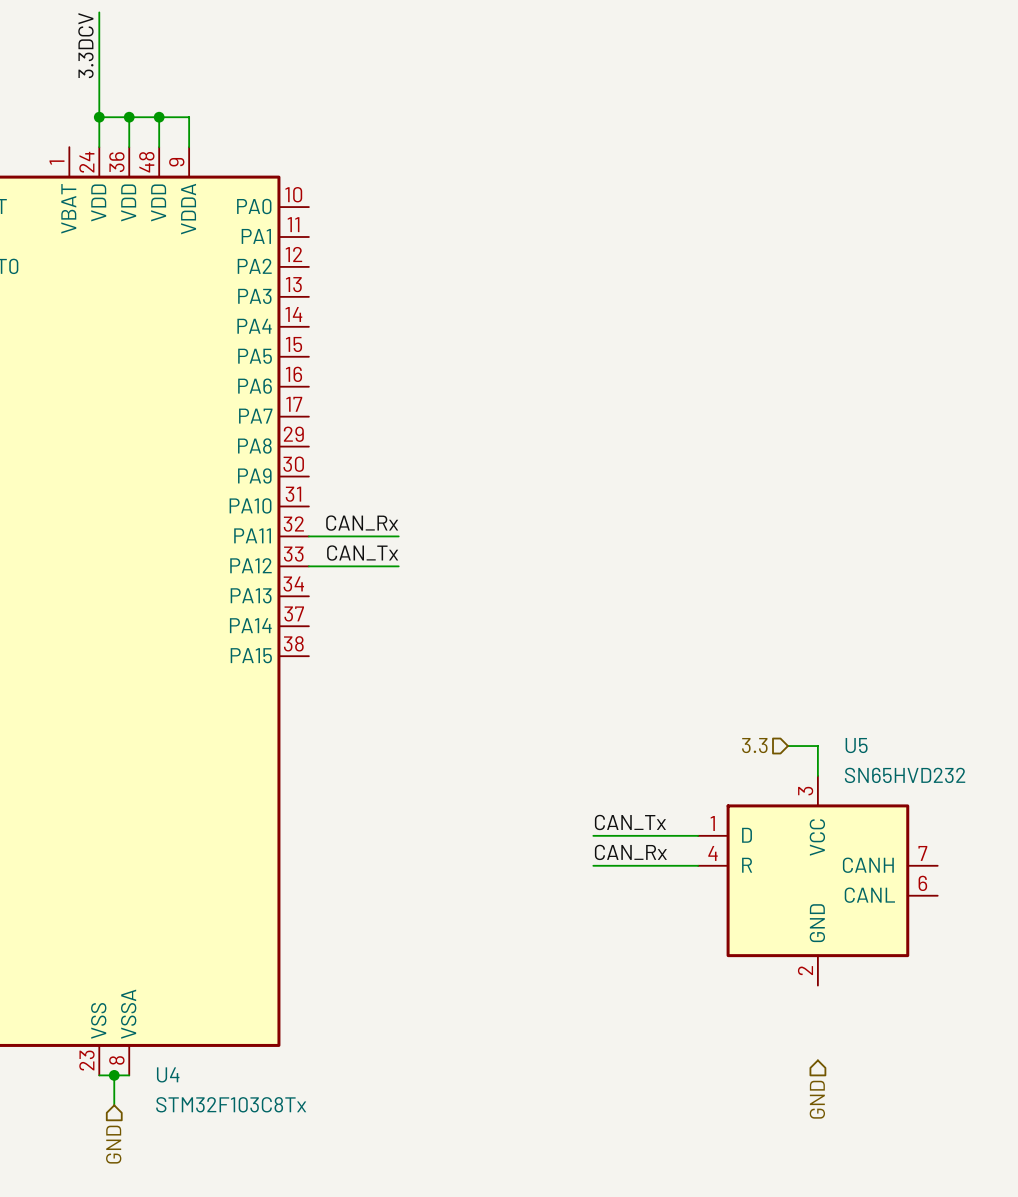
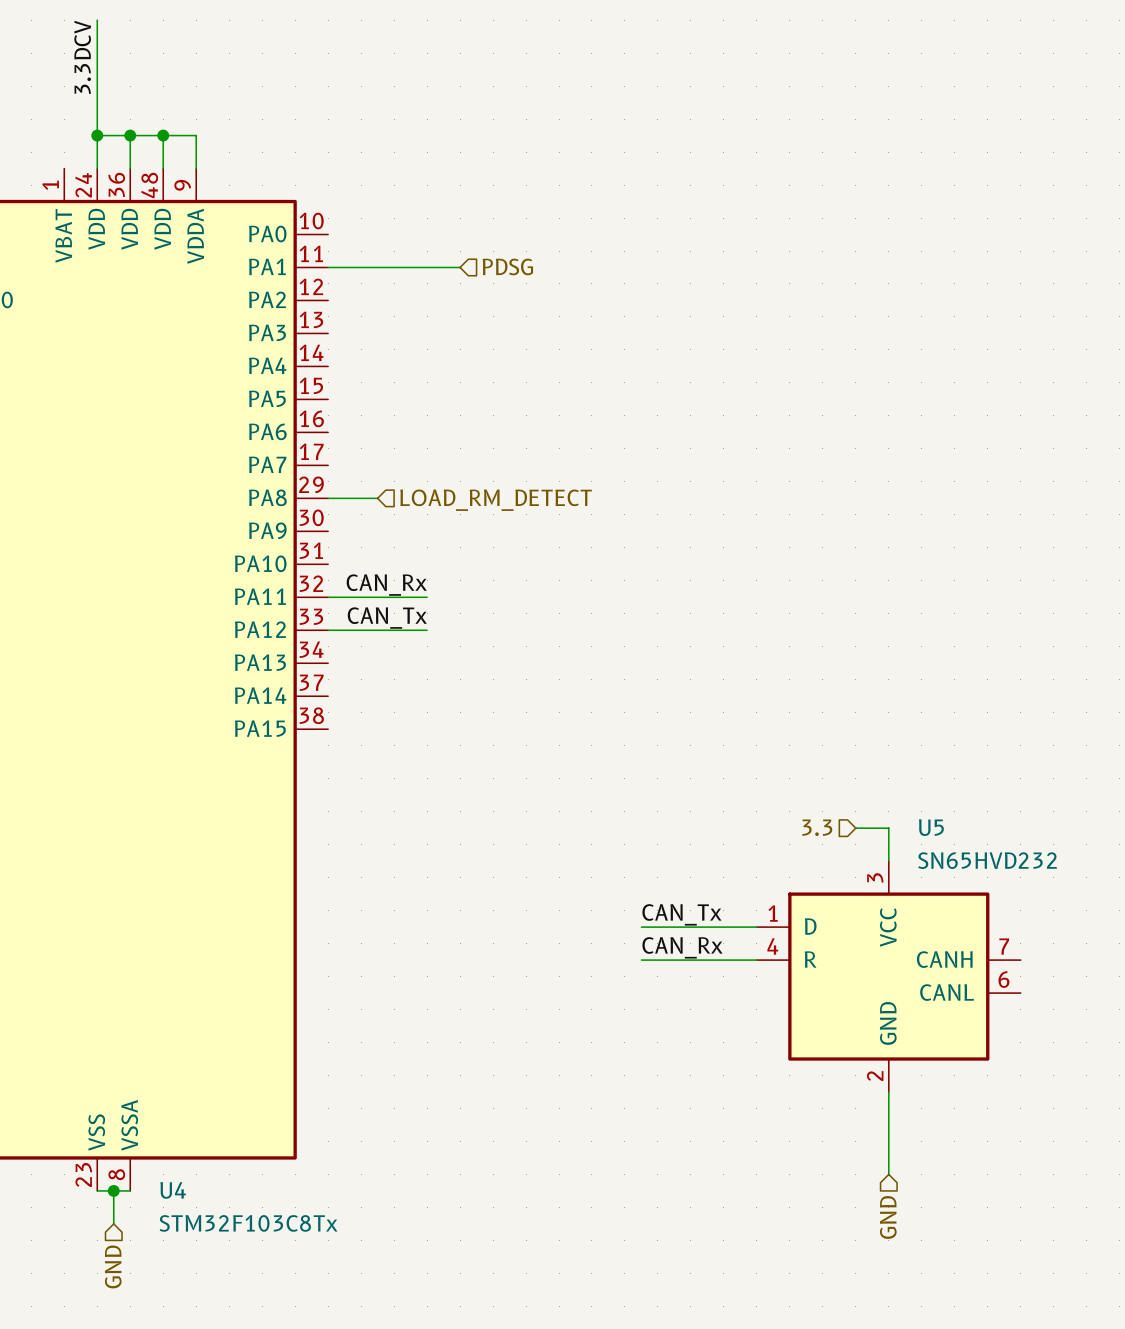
wire: none -> (328, 267) (460, 267)
hierarchical label: none -> PDSG (507, 266)
wire: none -> (328, 498) (377, 498)
hierarchical label: none -> LOAD_RM_DETECT (496, 500)
wire: none -> (888, 1092) (888, 1174)

